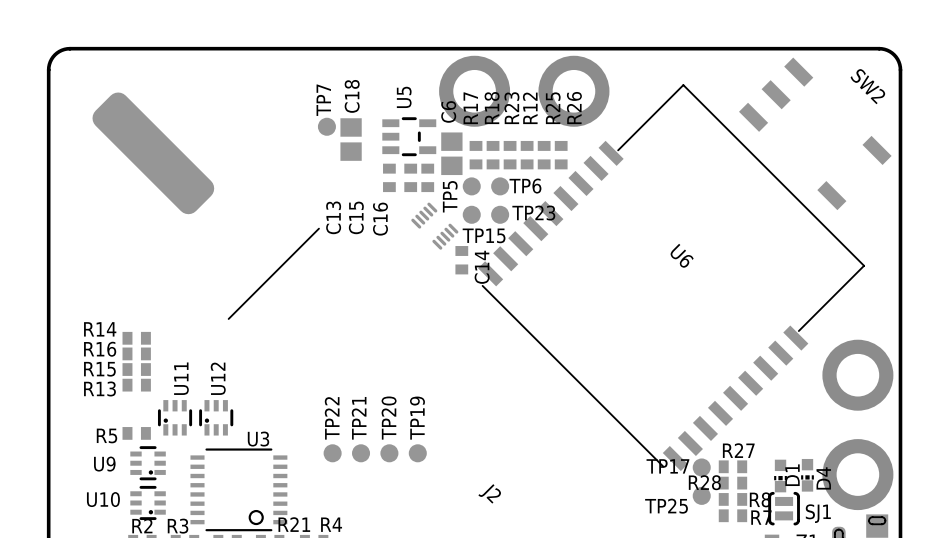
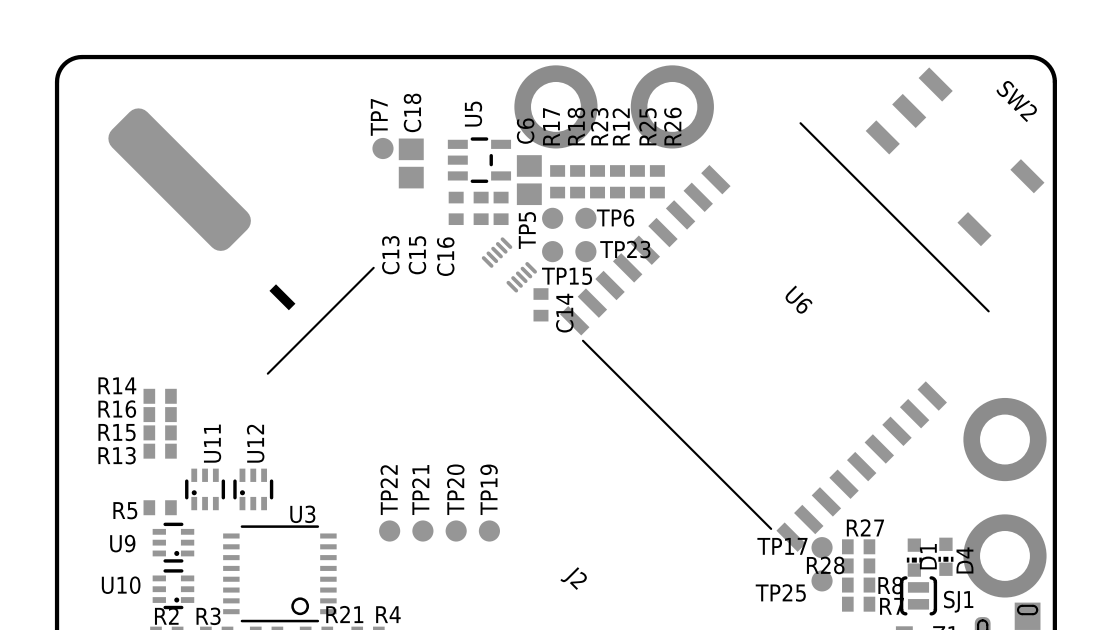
U6 footprint: [478, 84, 865, 472] -> [560, 122, 990, 552]
text: none -> - (282, 297)

